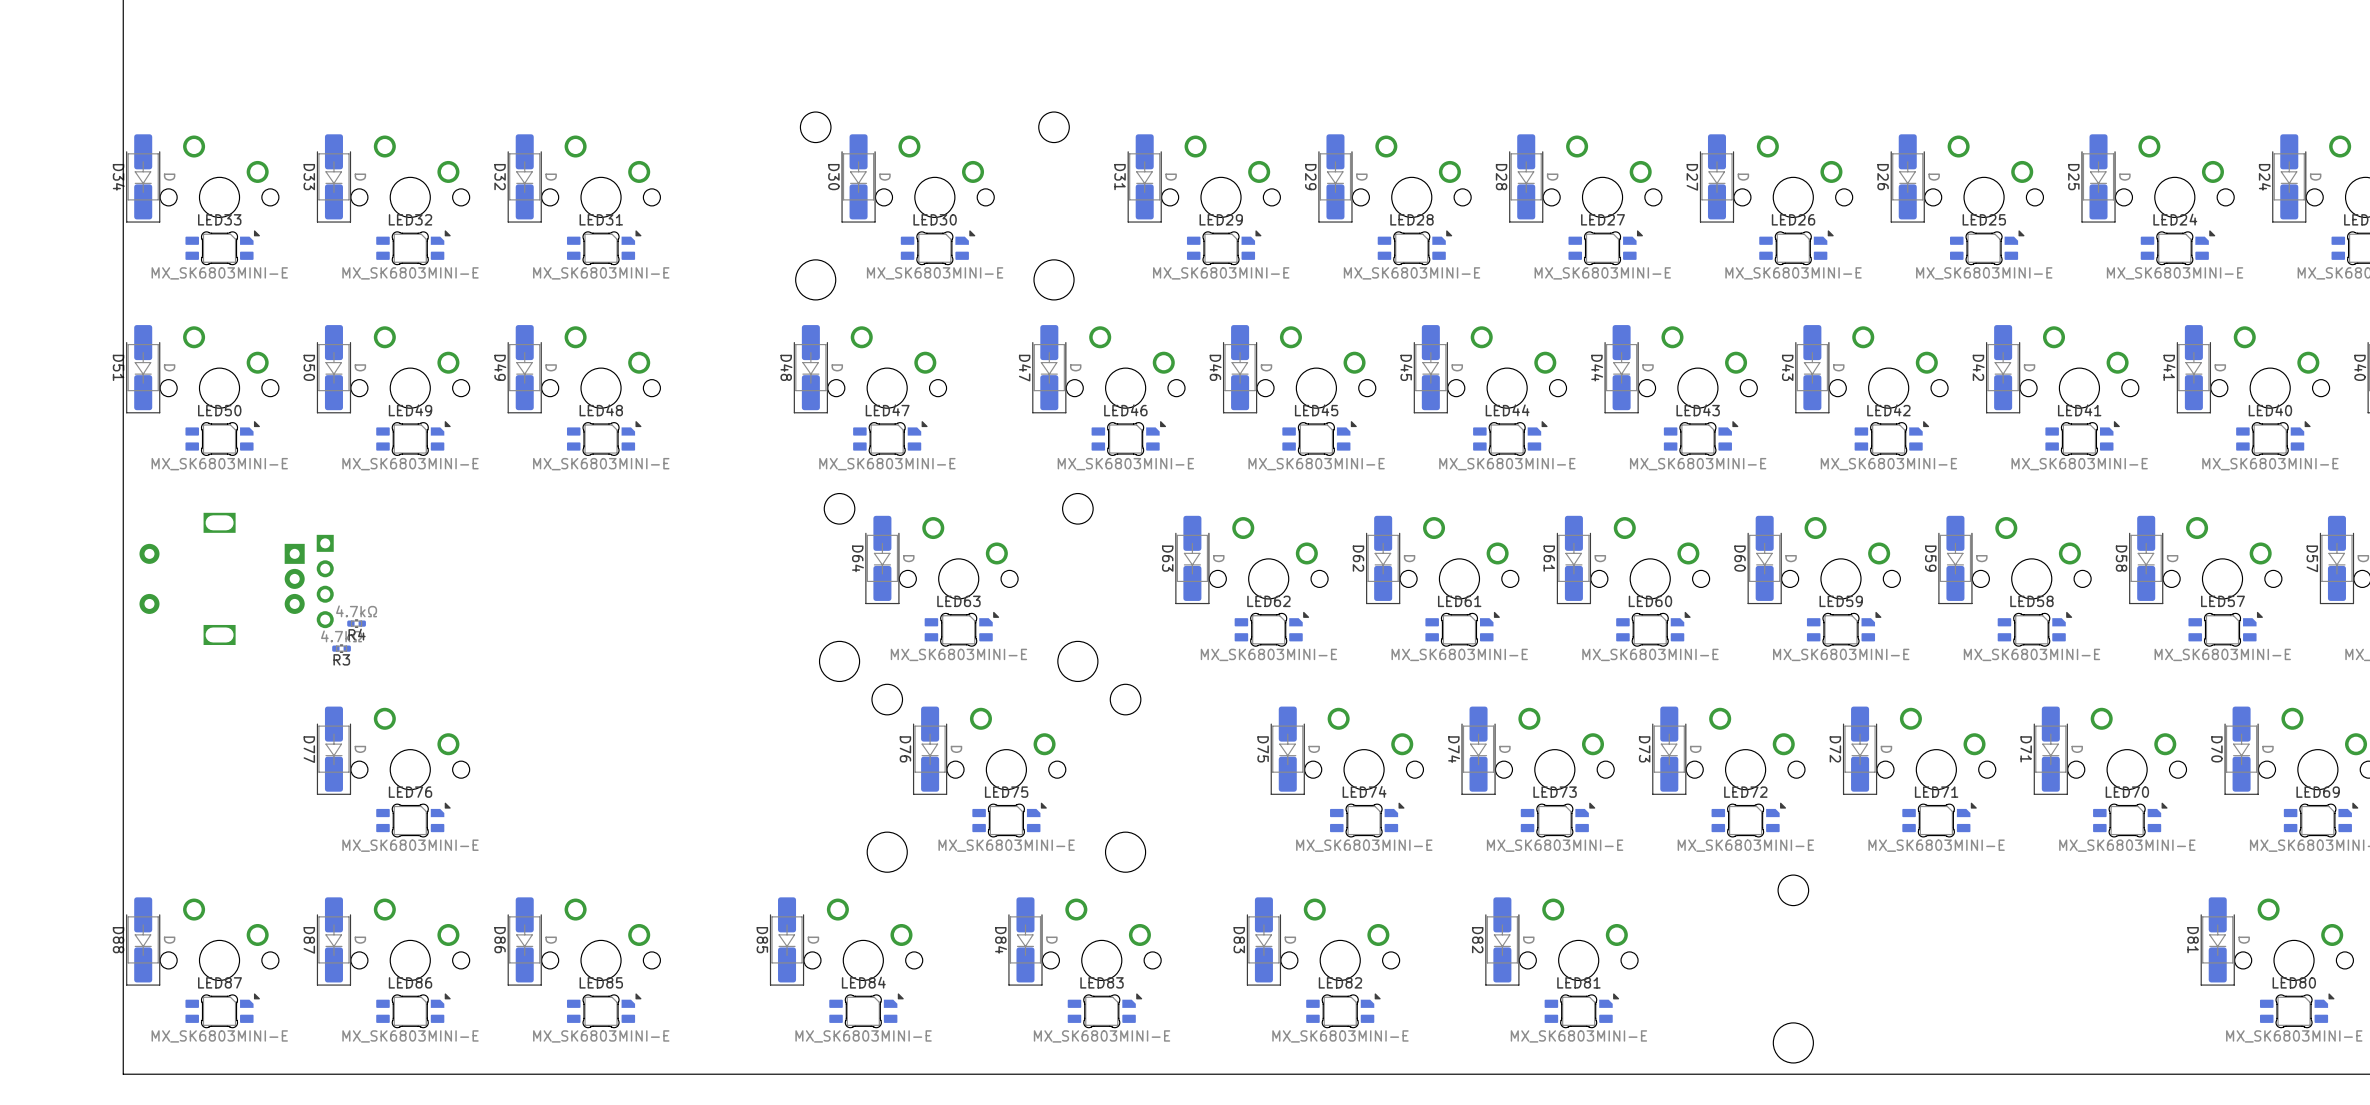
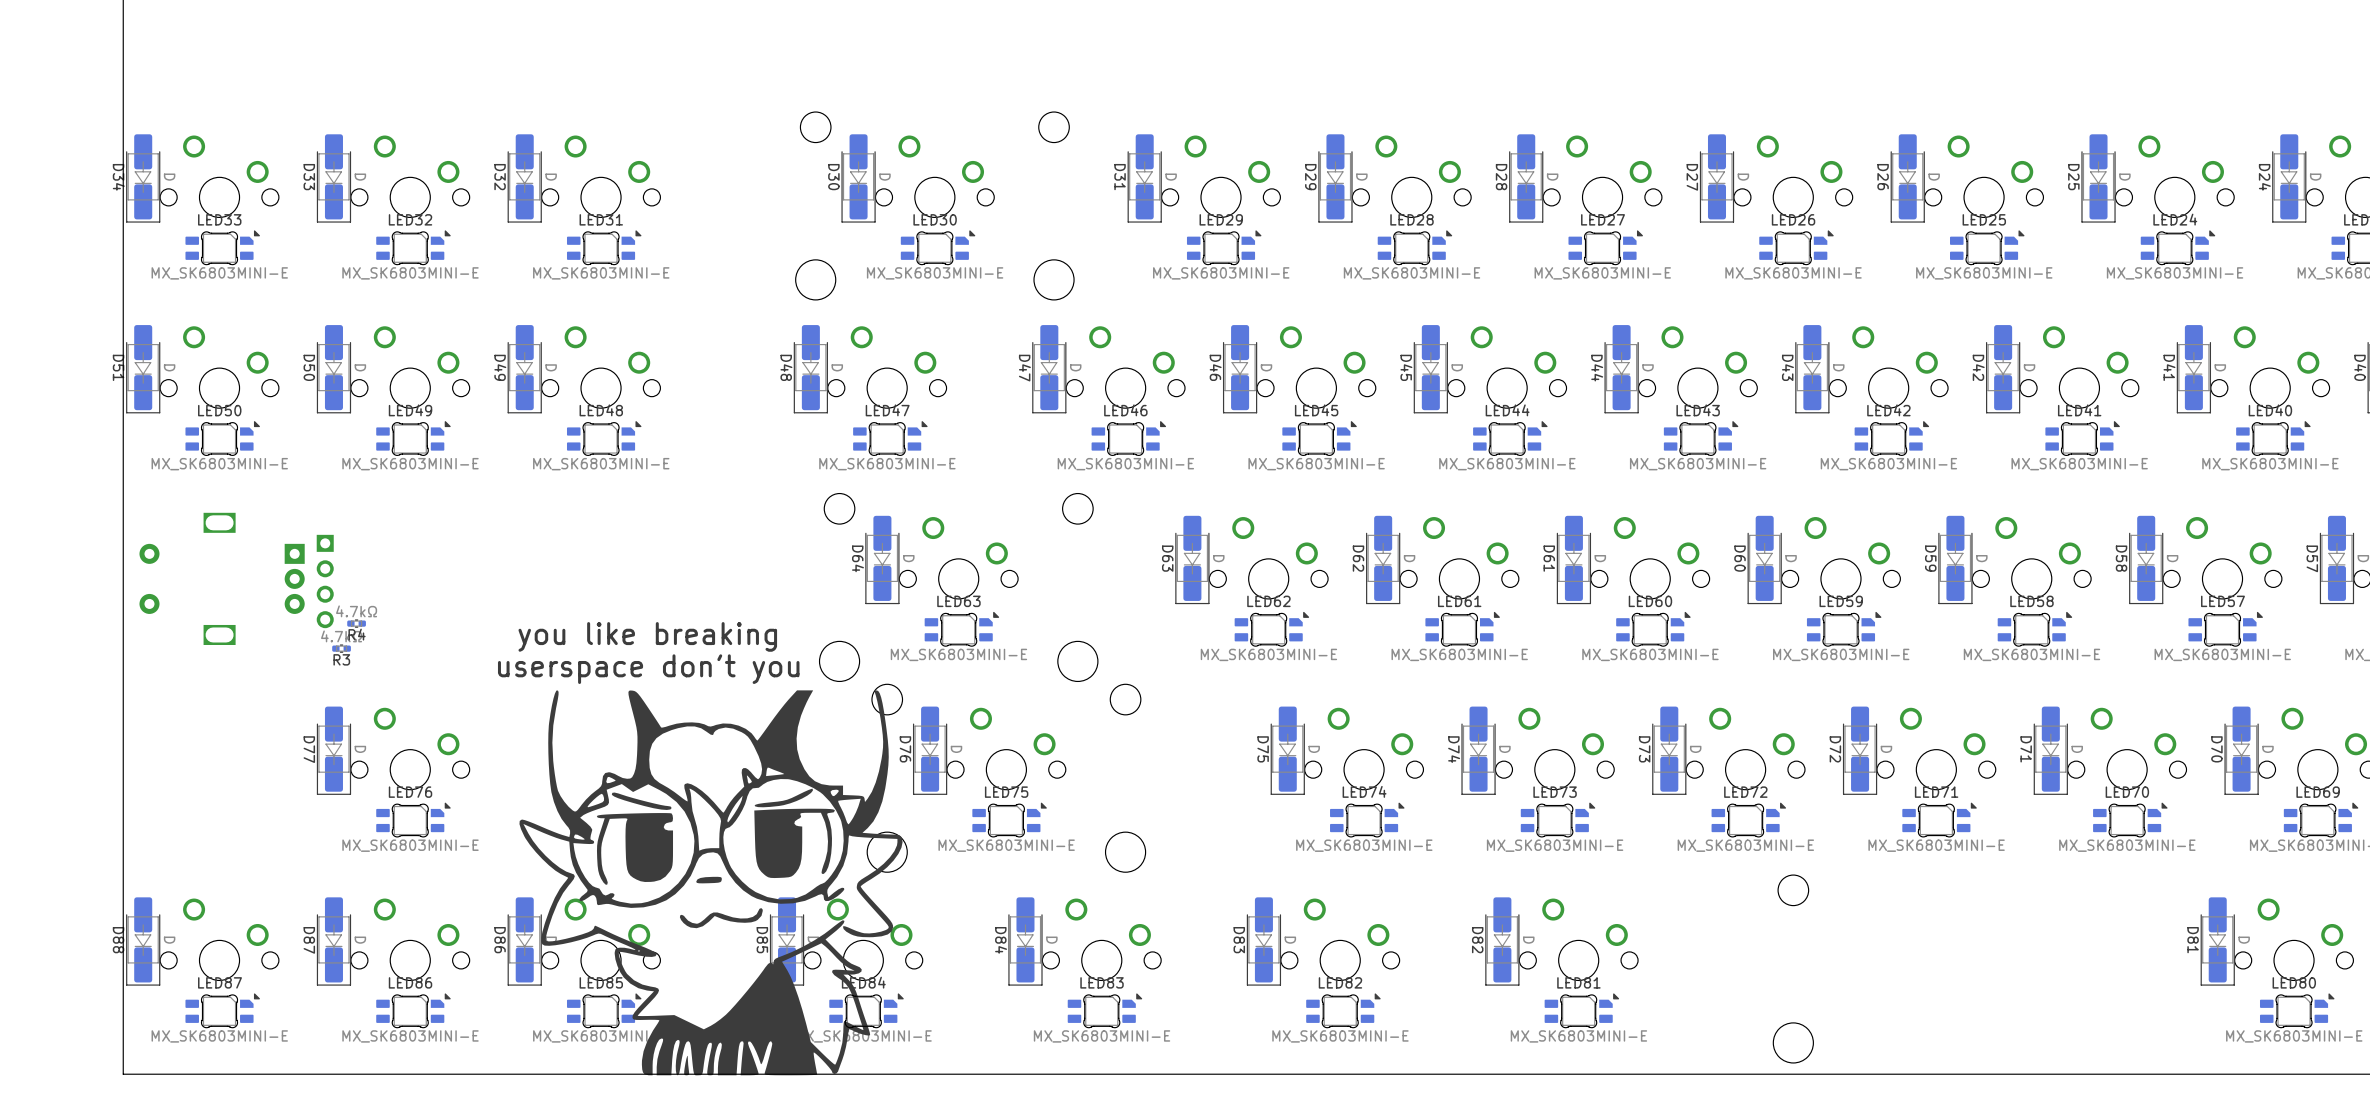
text: none -> you like breaking (647, 636)
text: none -> userspace don't you (648, 669)
drawing: none -> [519, 690, 903, 1076]

